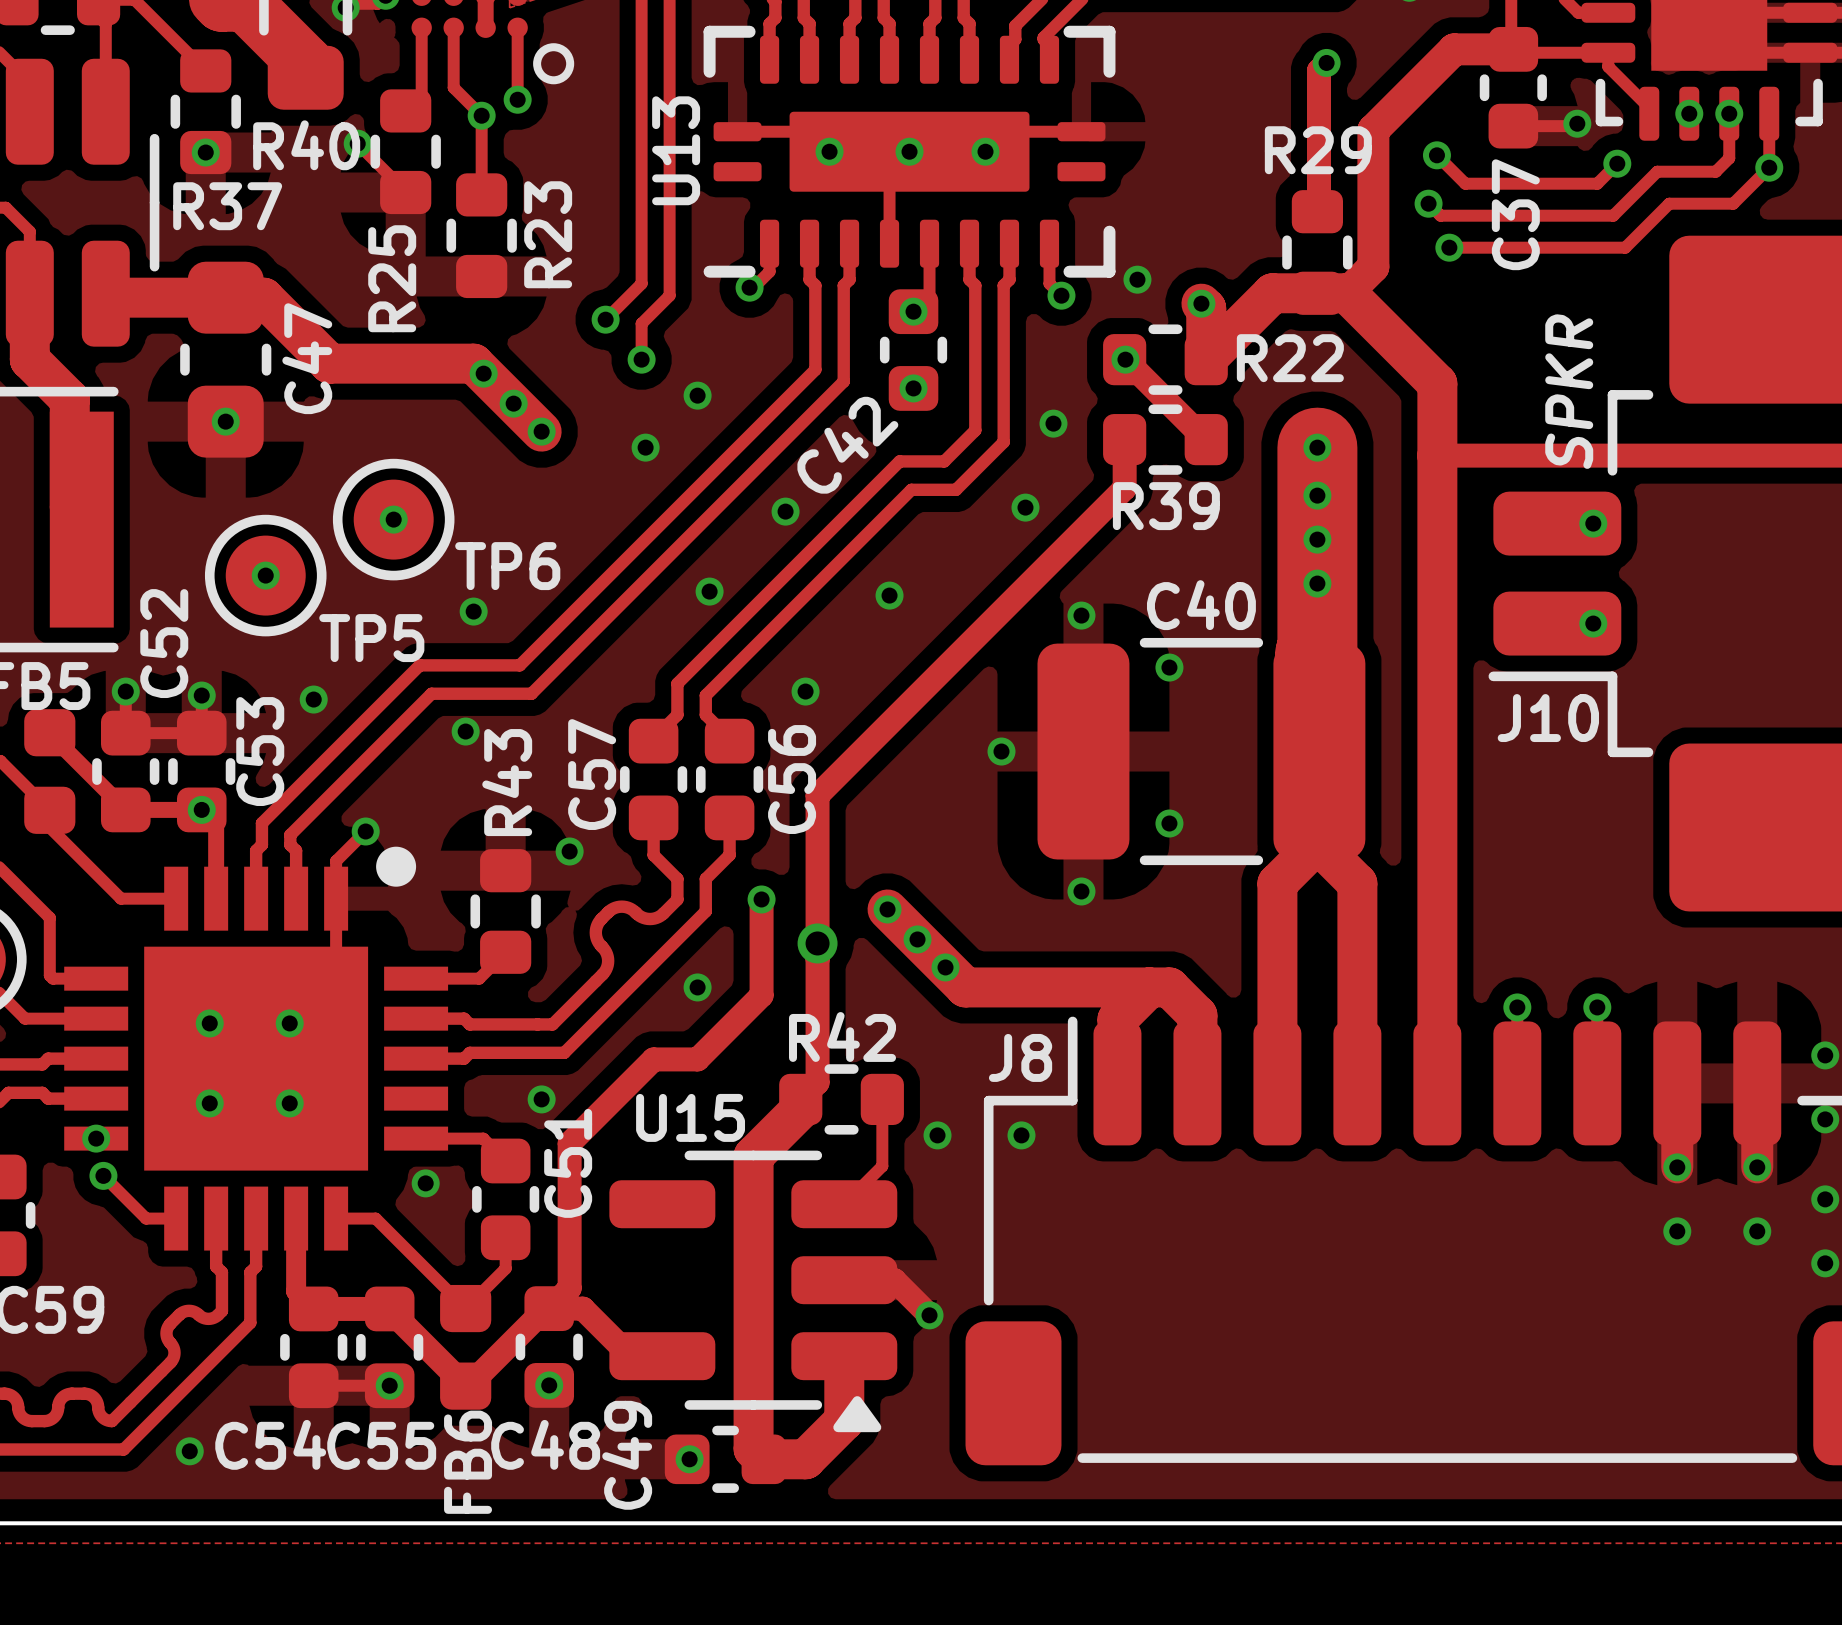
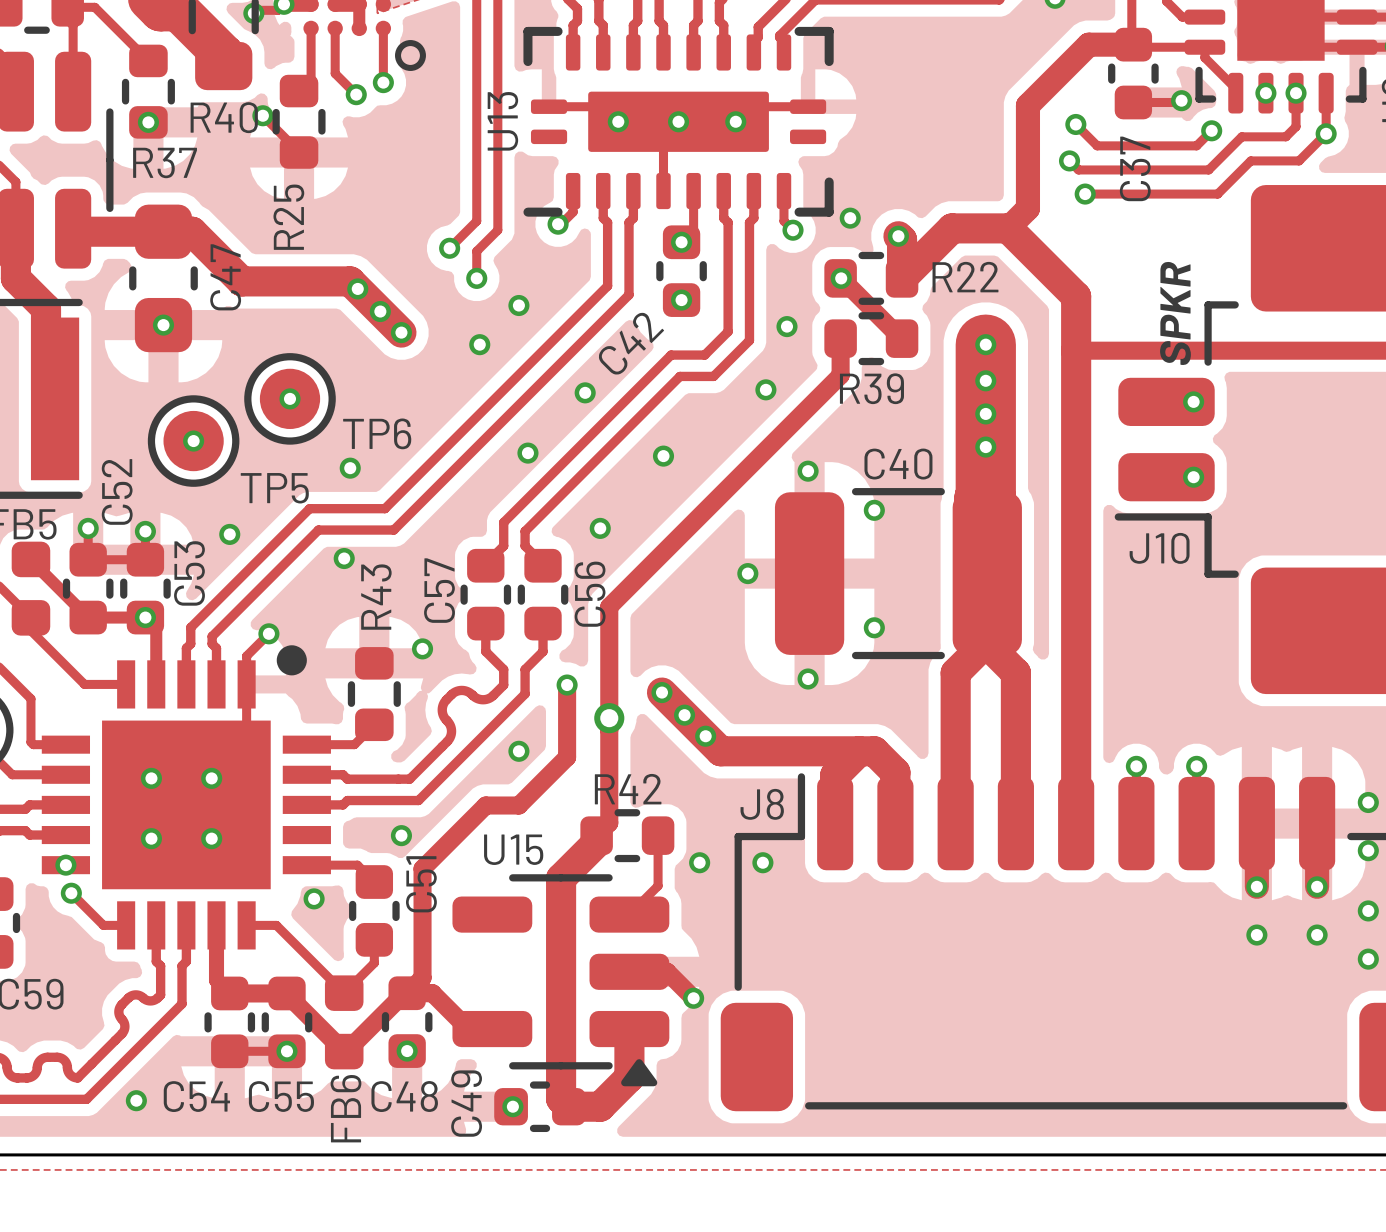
track: (1326, 62) (1319, 70) (1319, 210) (1317, 211) -> none
via: (1326, 62) -> none
track: (481, 115) (481, 194) -> none
R23: (481, 235) -> none
R29: (1317, 252) -> none

